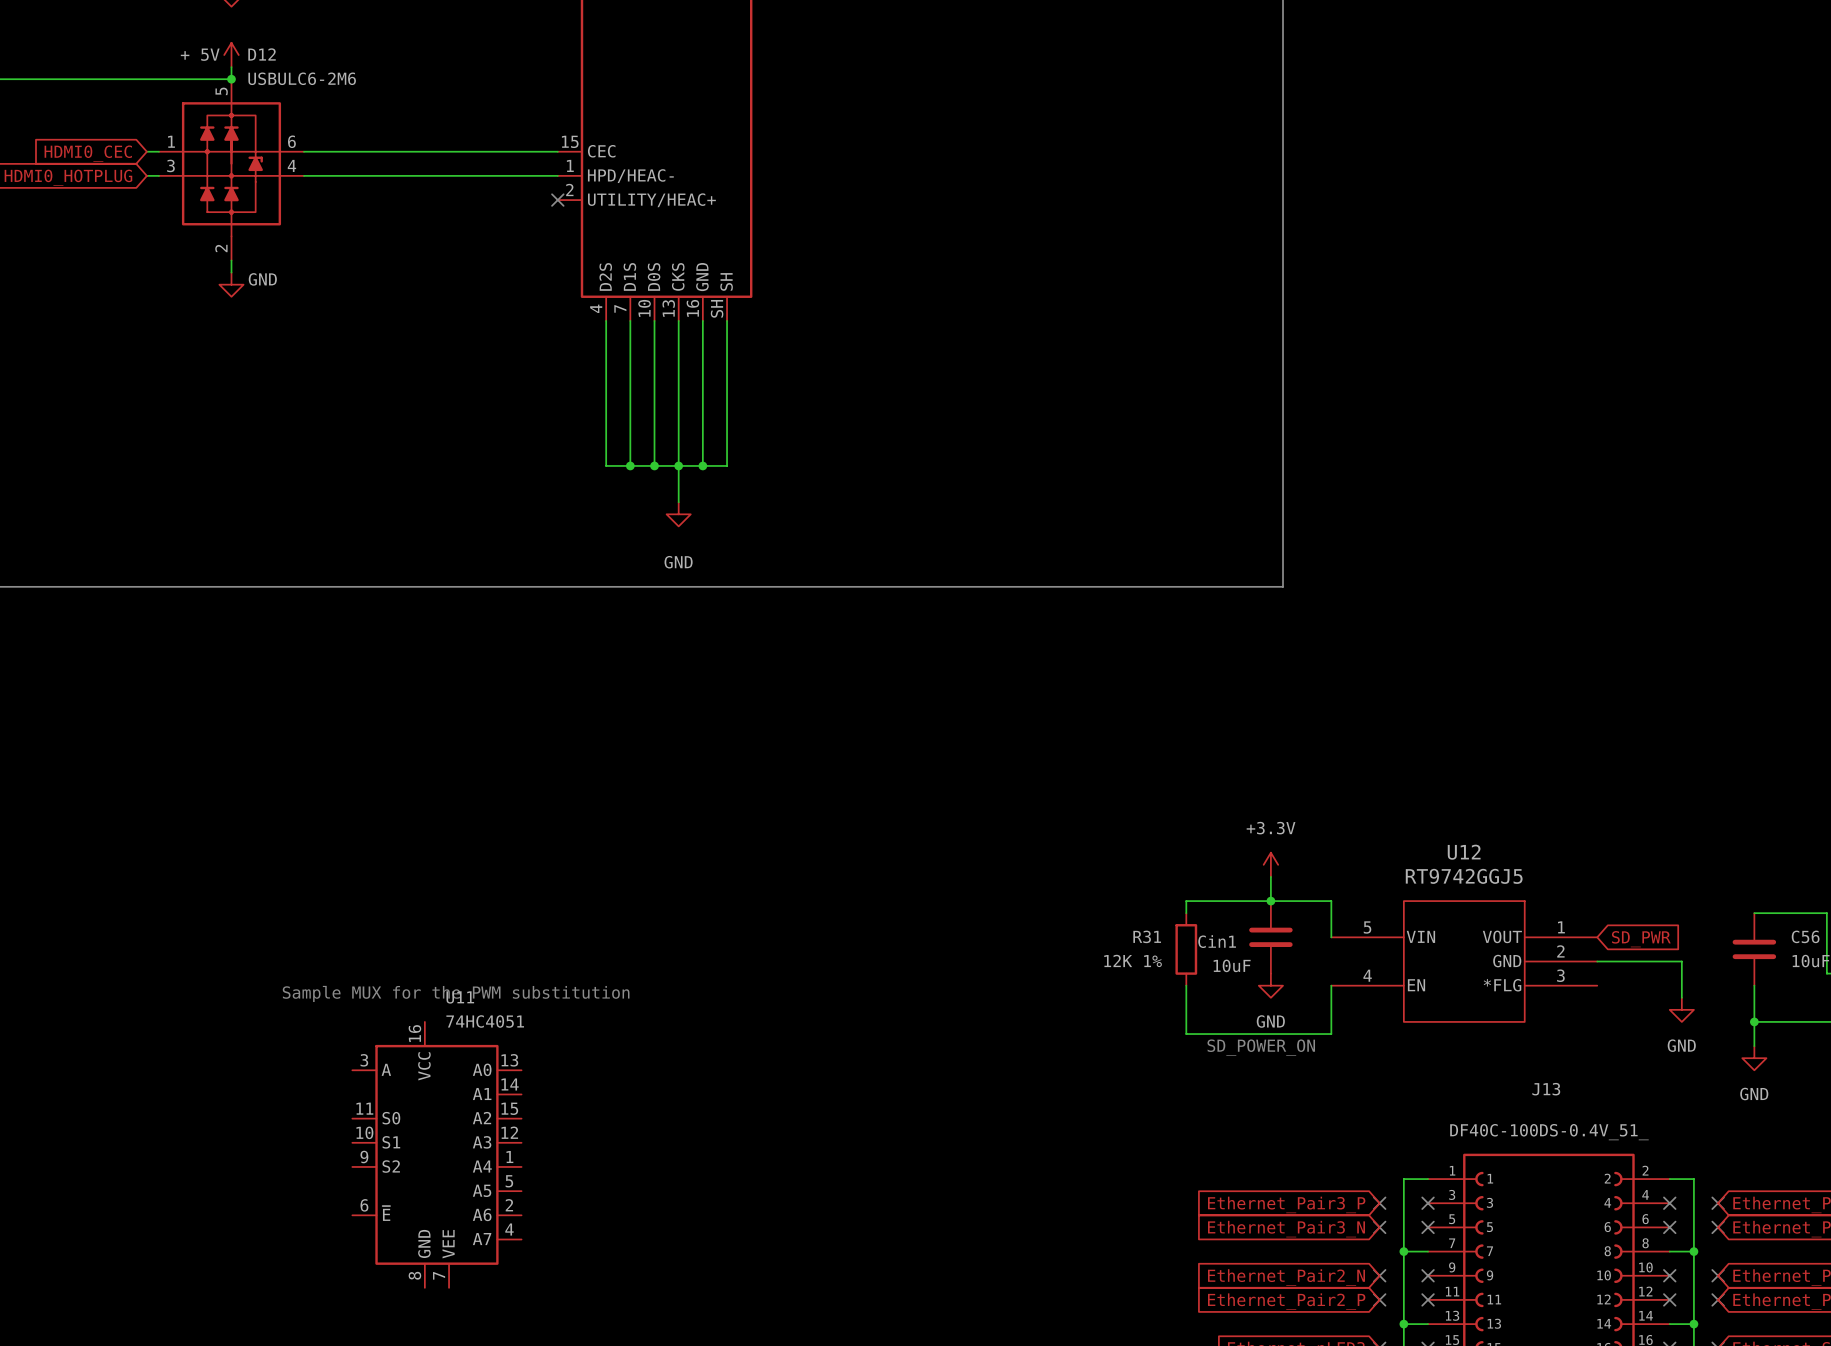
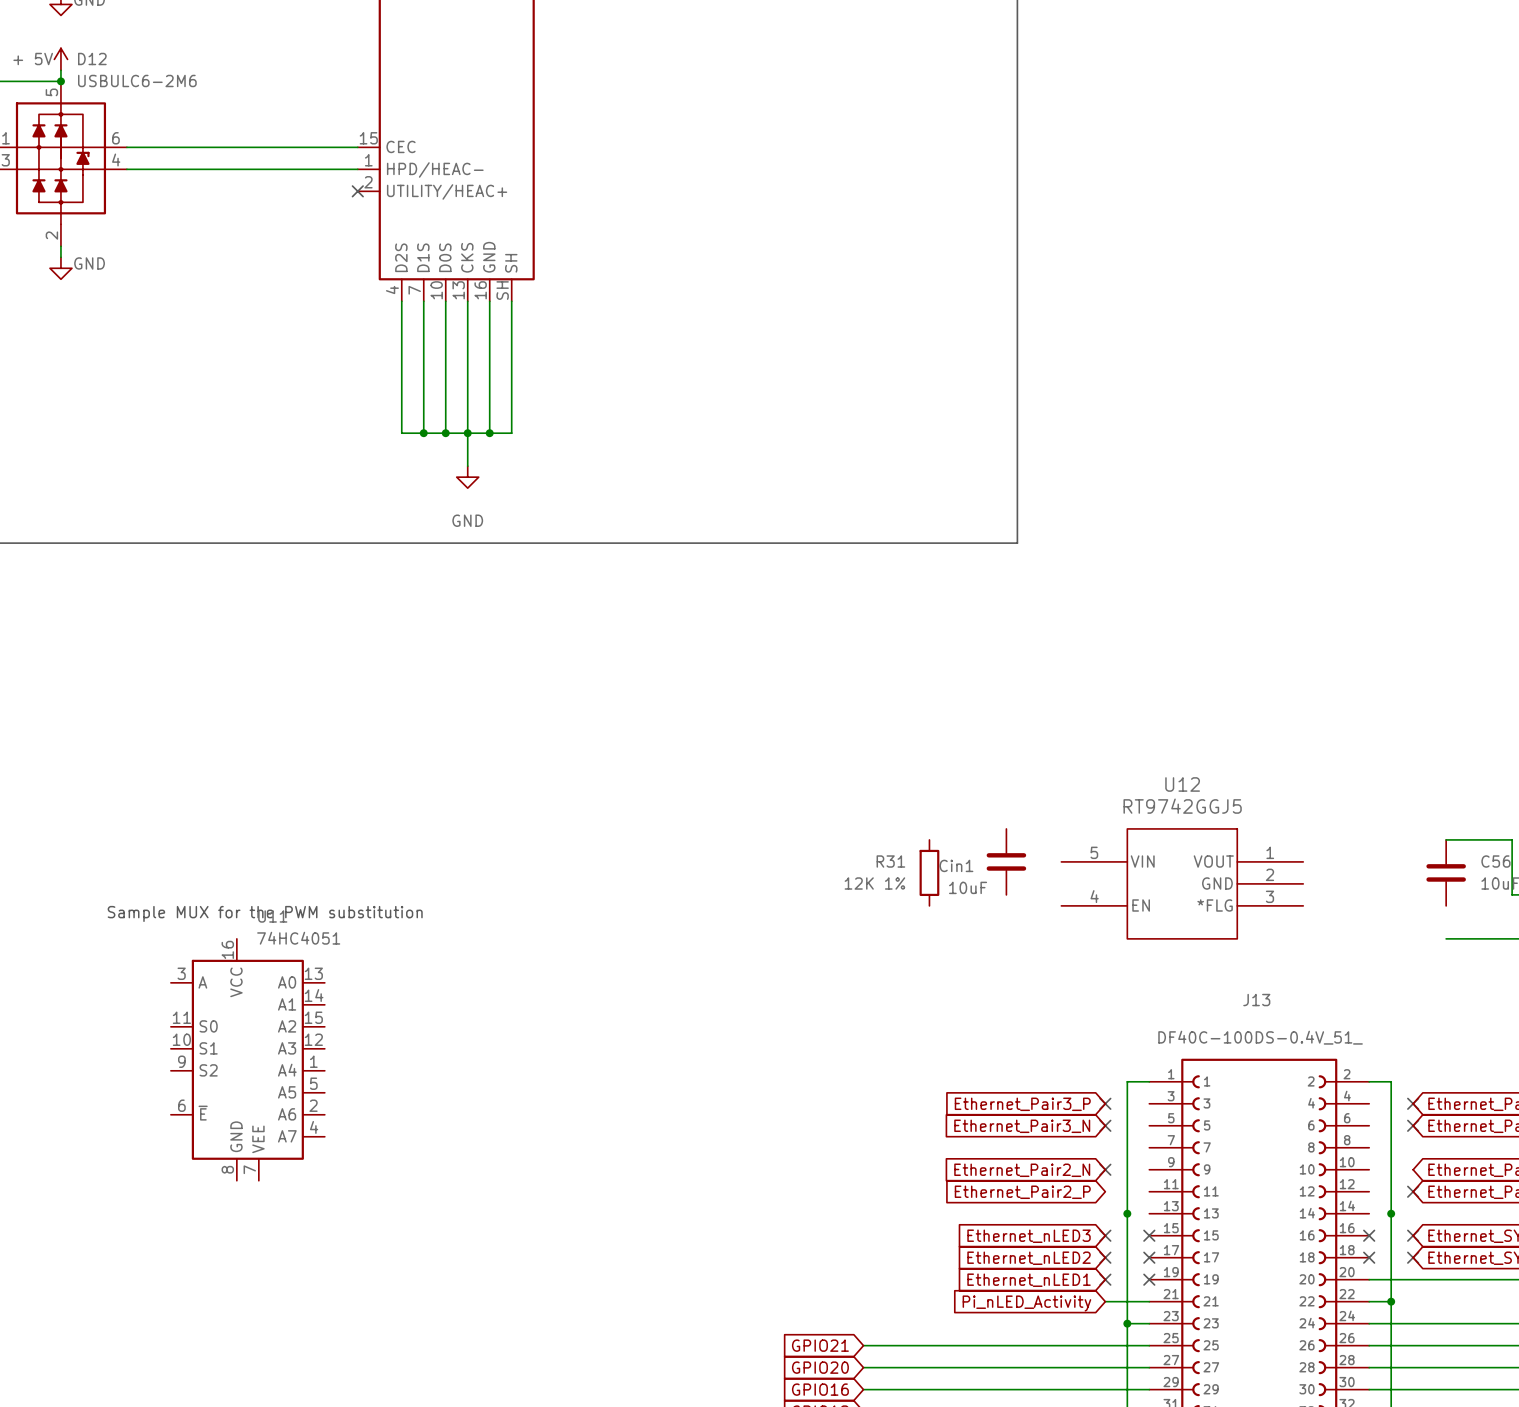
power symbol: +3.3V (1270, 864) -> none
wire: (1270, 876) (1270, 901) -> none
junction: (1270, 901) -> none
wire: (1186, 913) (1186, 901) (1331, 901) (1331, 937) -> none
global label: SD_PWR (1641, 939) -> none
wire: (1597, 961) (1681, 961) (1681, 997) -> none
wire: (1186, 985) (1186, 1034) (1331, 1034) (1331, 985) -> none
power symbol: GND (1270, 985) -> none
wire: (1754, 985) (1754, 1046) -> none
power symbol: GND (1681, 1009) -> none
junction: (1754, 1021) -> none
text: SD_POWER_ON (1261, 1047) -> none
power symbol: GND (1754, 1058) -> none
no-connect mark: (1428, 1203) -> none
no-connect mark: (1669, 1203) -> none
no-connect mark: (1428, 1227) -> none
no-connect mark: (1669, 1227) -> none
wire: (1403, 1251) (1428, 1251) -> none
junction: (1403, 1251) -> none
wire: (1669, 1251) (1693, 1251) -> none
junction: (1693, 1251) -> none
no-connect mark: (1428, 1275) -> none
no-connect mark: (1669, 1275) -> none
no-connect mark: (1718, 1275) -> none
no-connect mark: (1379, 1299) -> none
no-connect mark: (1428, 1299) -> none
no-connect mark: (1669, 1299) -> none
wire: (1403, 1324) (1428, 1324) -> none
wire: (1669, 1324) (1693, 1324) -> none

